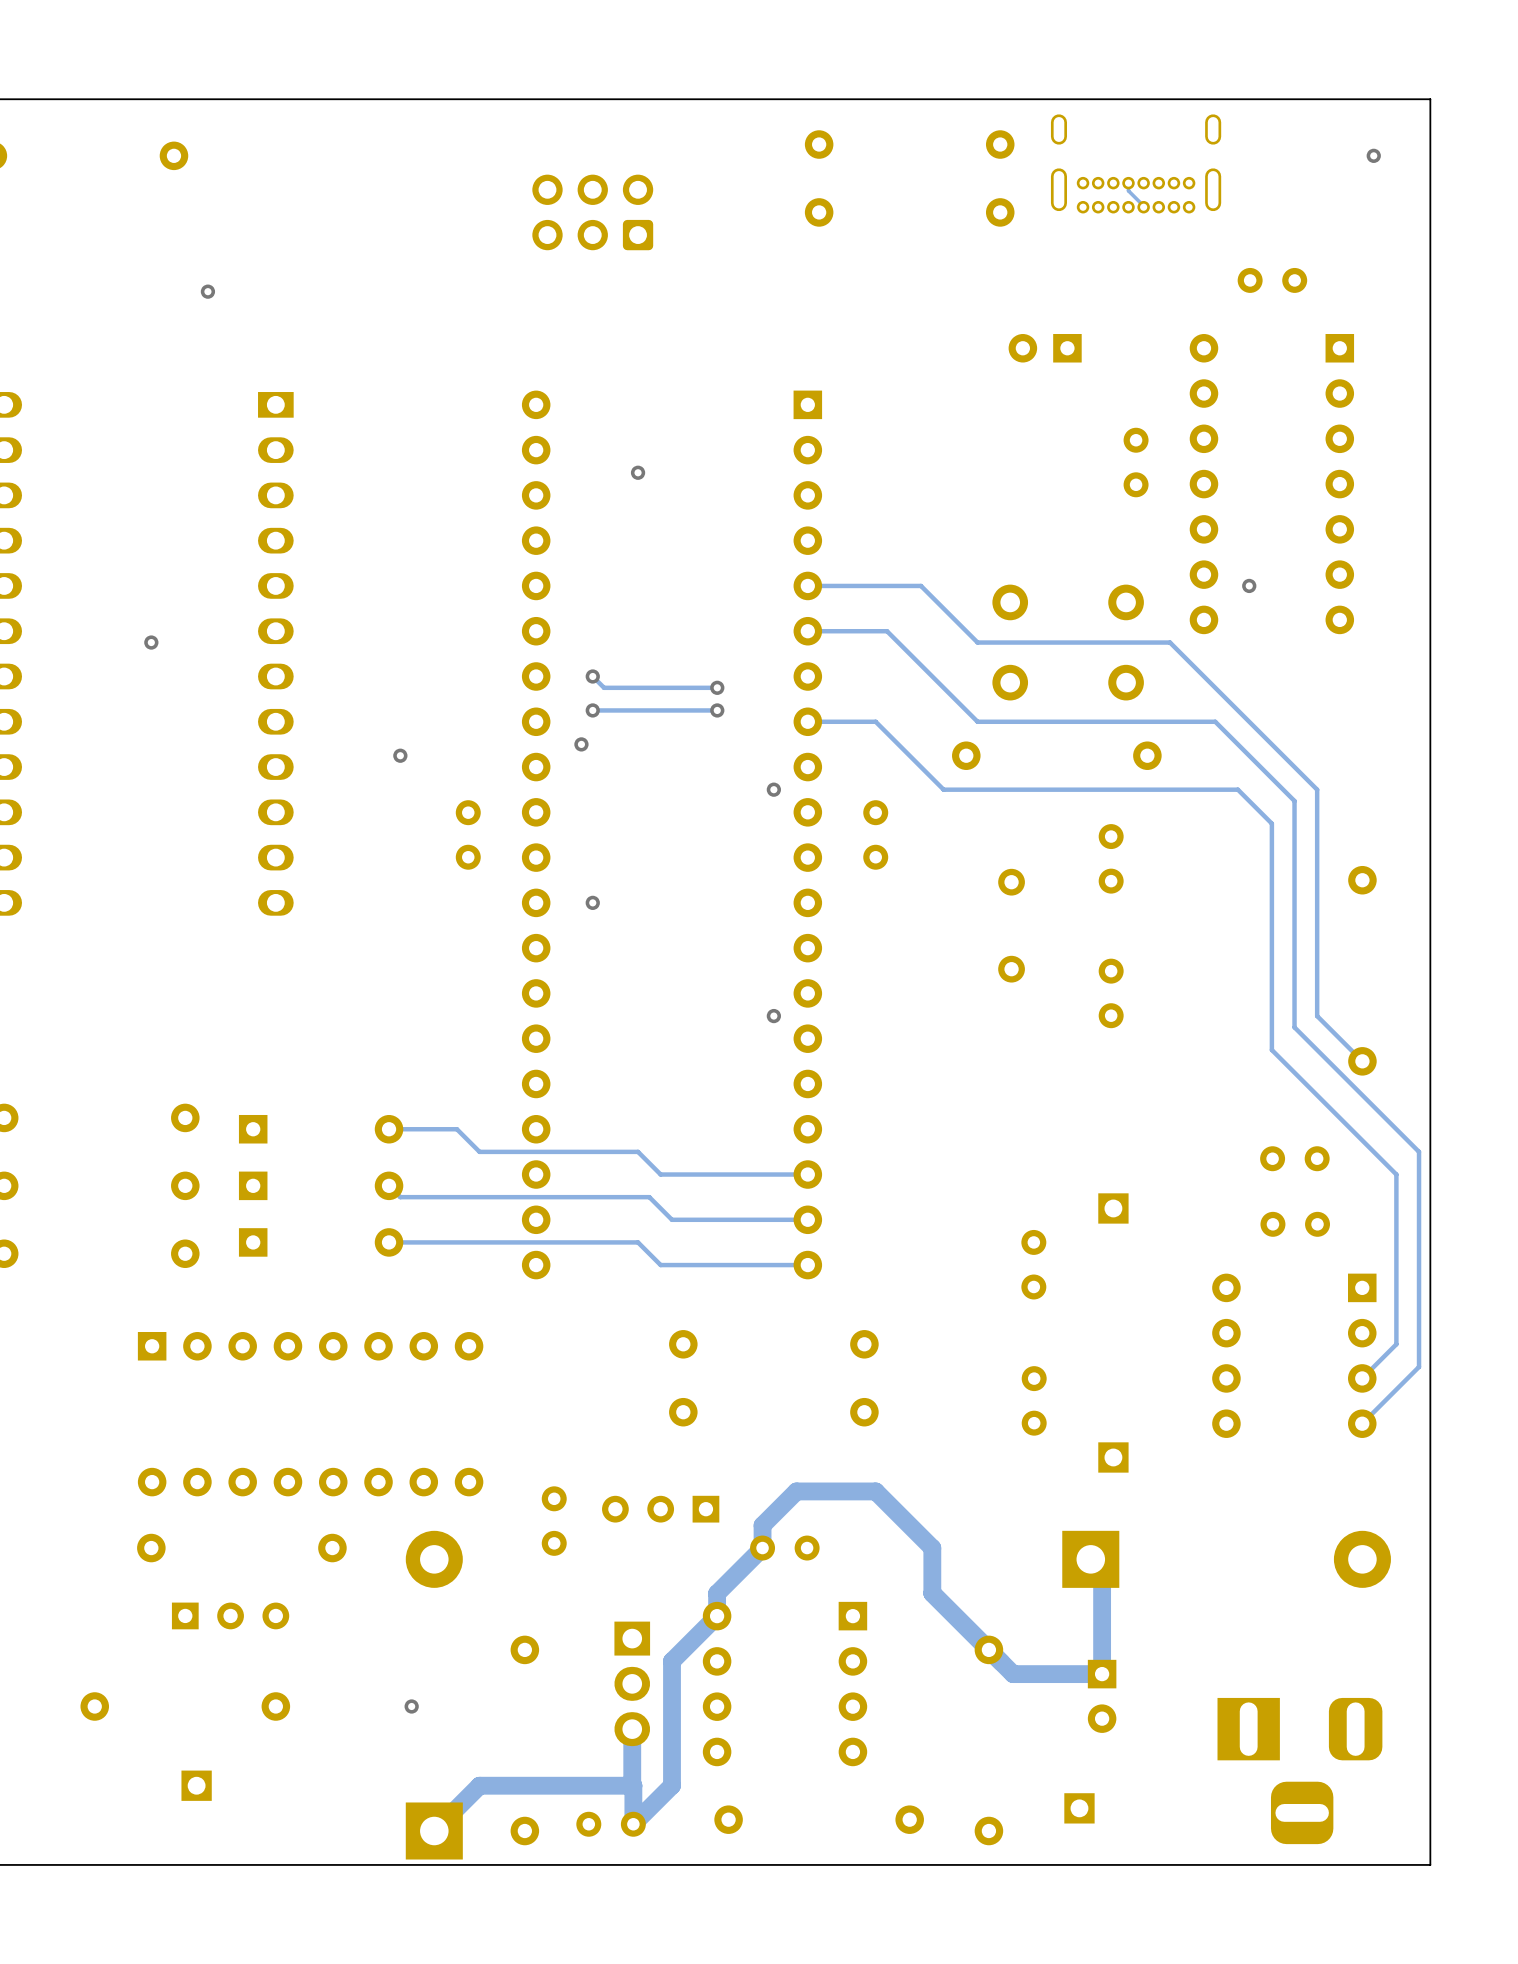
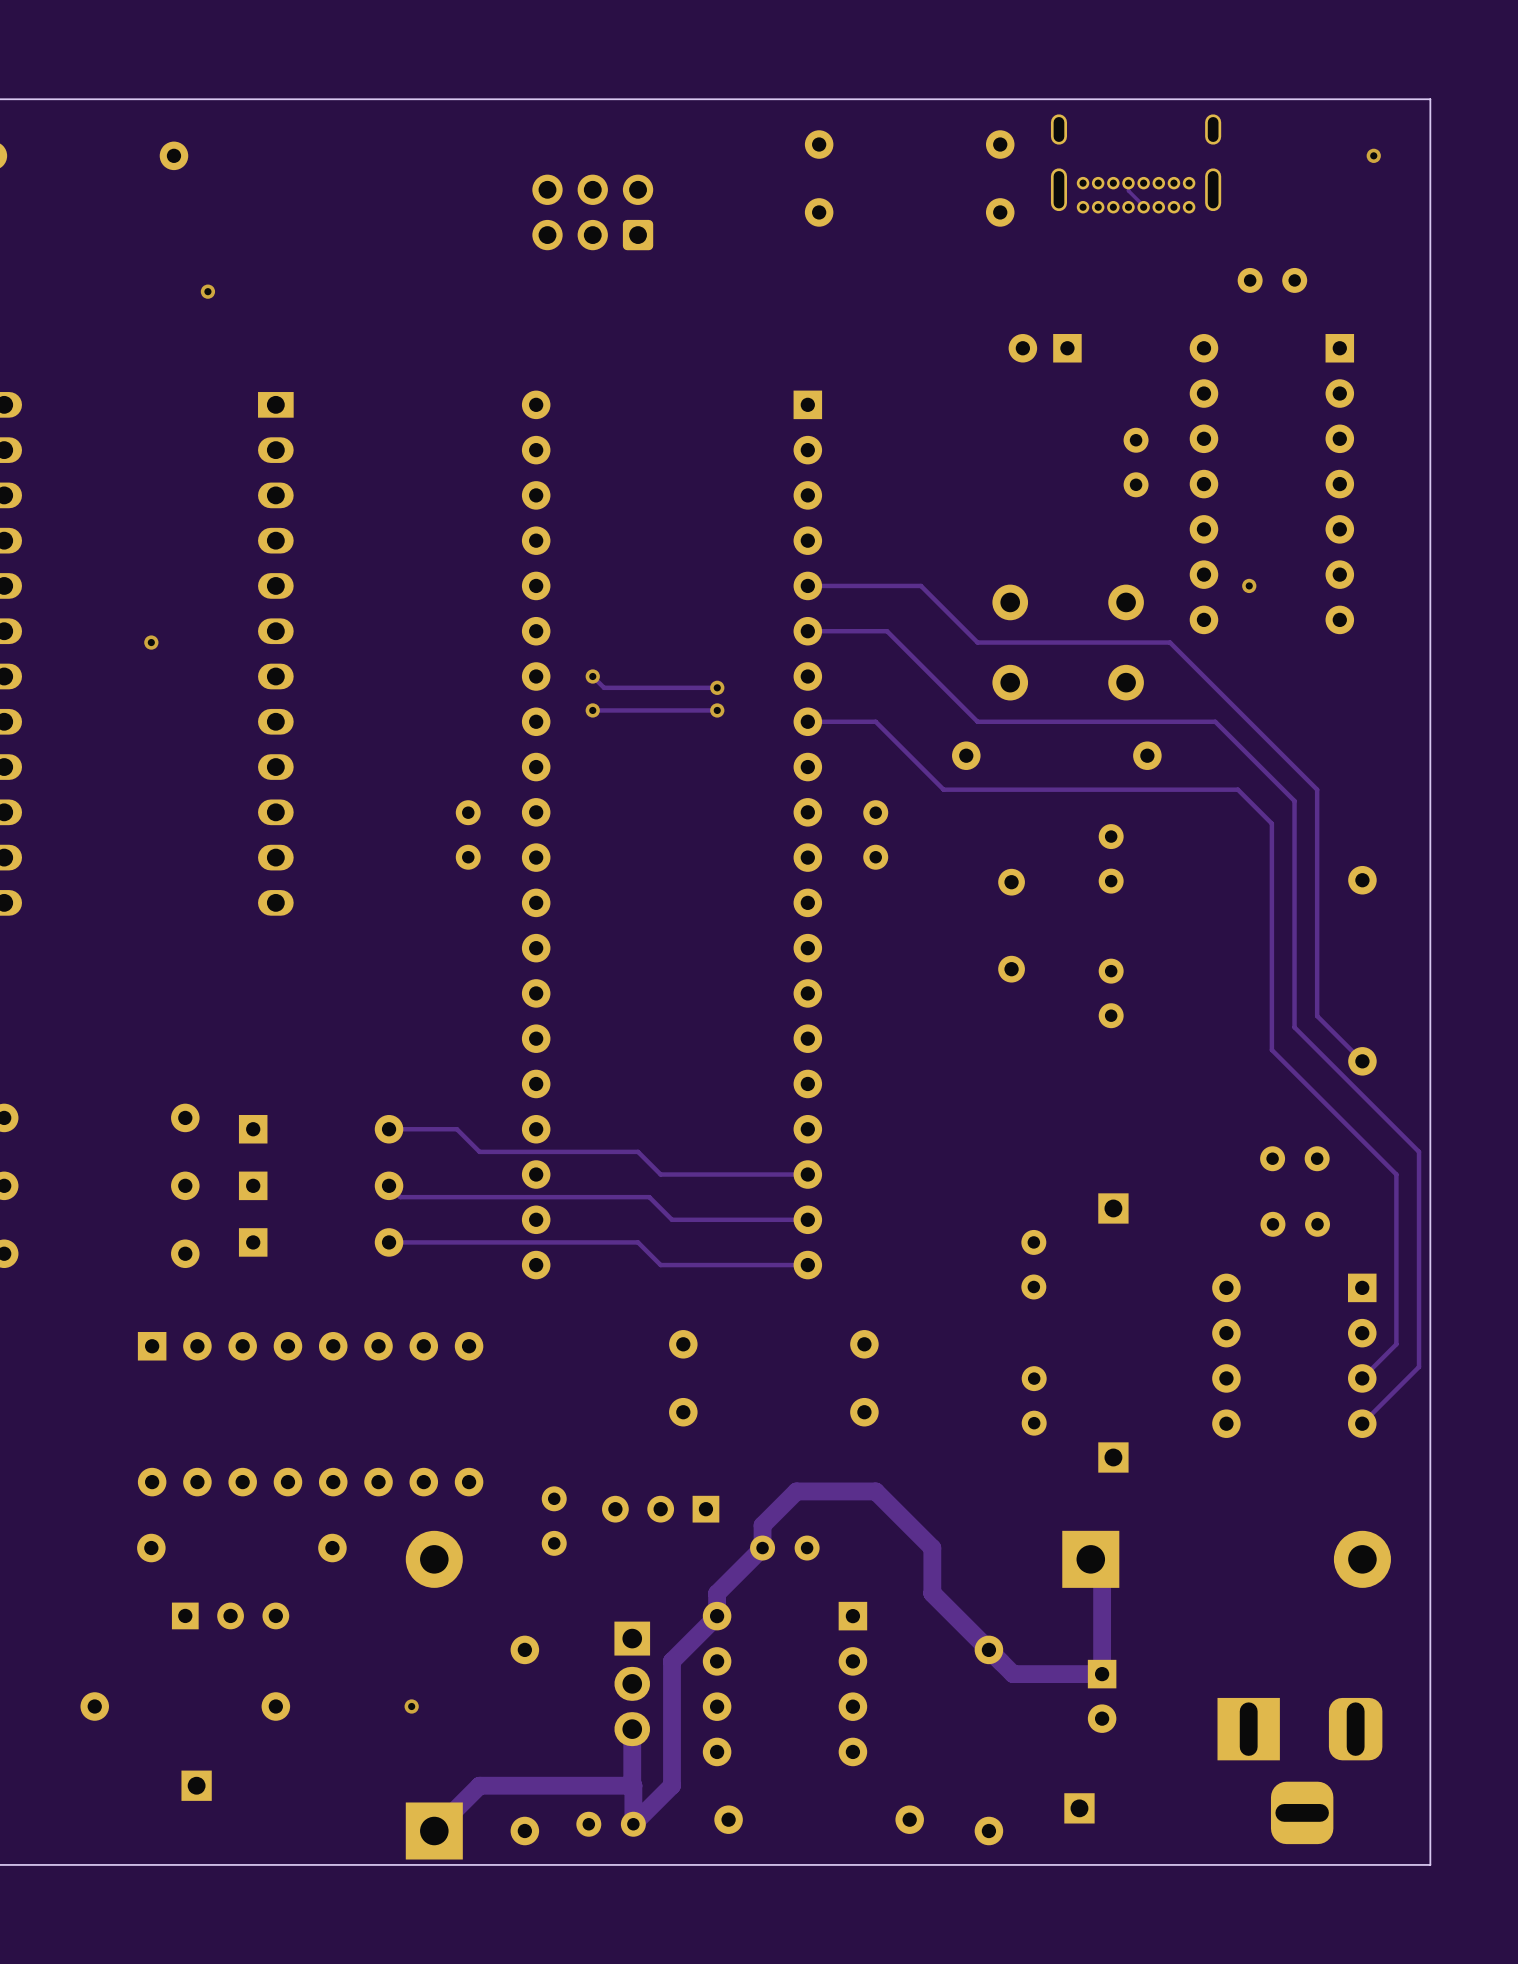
via: (638, 472) -> none
via: (581, 744) -> none
via: (400, 755) -> none
via: (773, 789) -> none
via: (592, 902) -> none
via: (773, 1016) -> none

